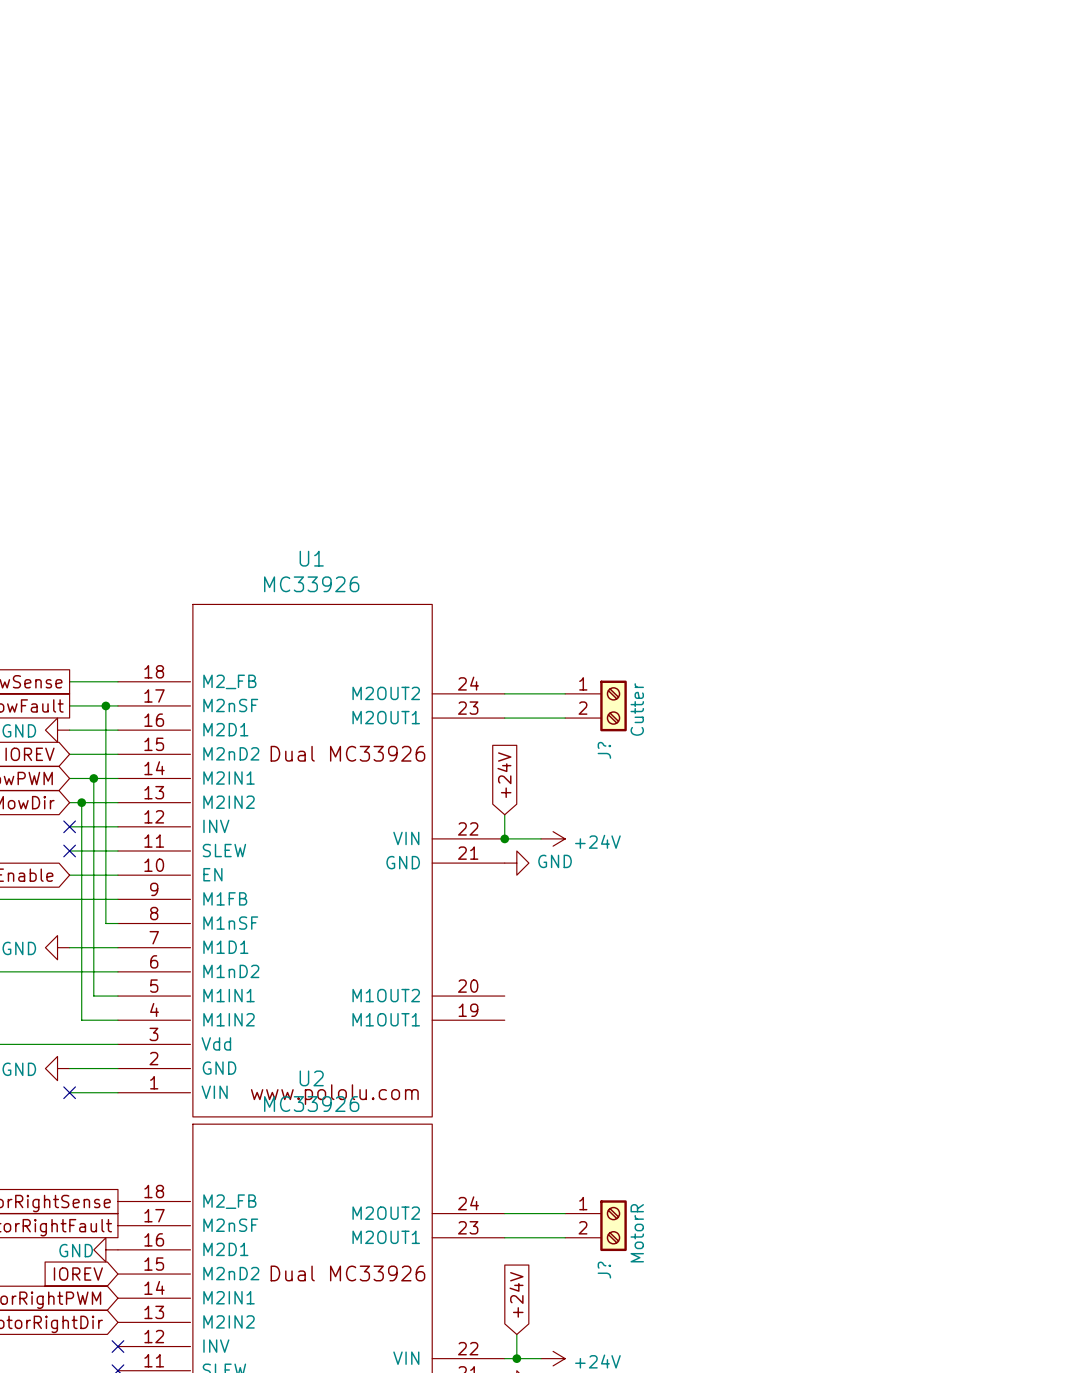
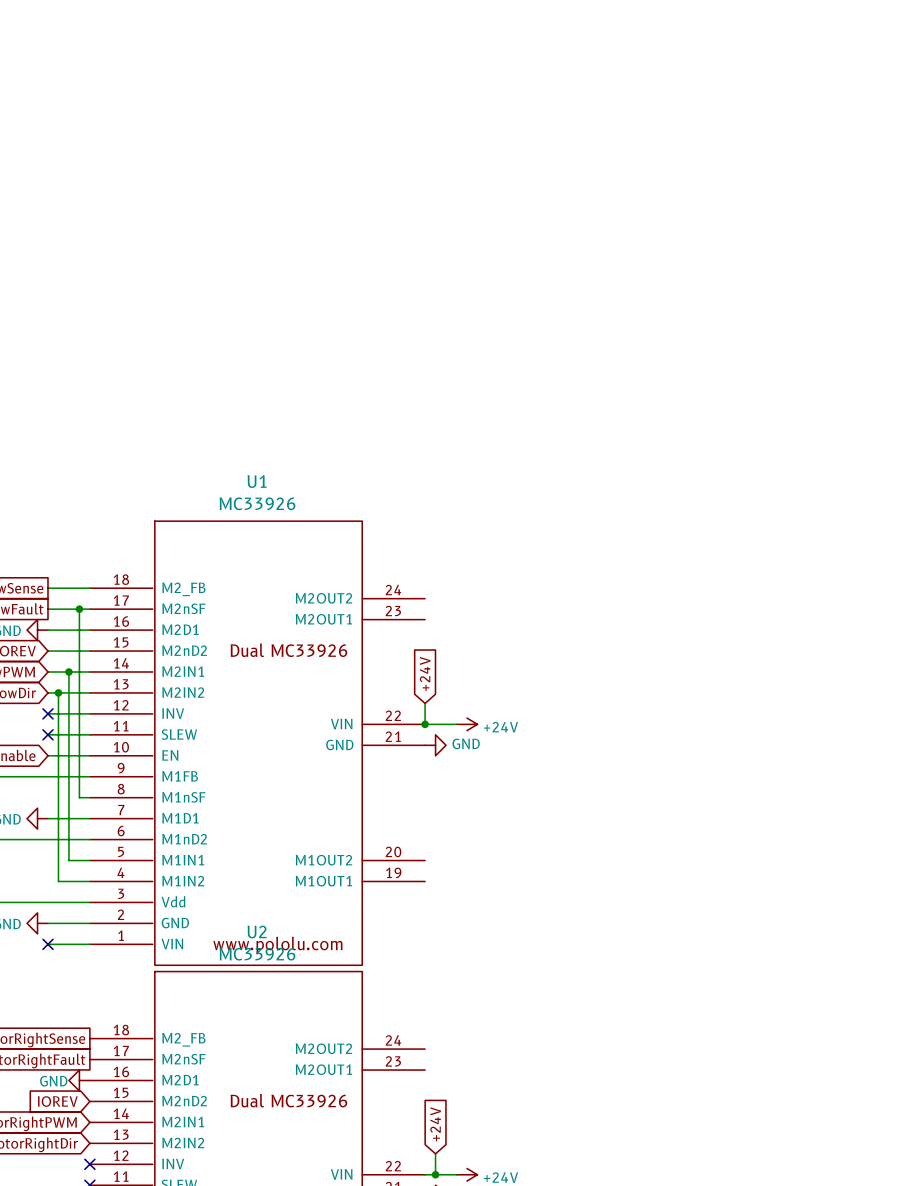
wire: (504, 693) (565, 693) -> none
J?: Cutter (595, 705) -> none
wire: (504, 718) (565, 718) -> none
wire: (504, 1213) (565, 1213) -> none
J?: MotorR (595, 1225) -> none
wire: (504, 1237) (565, 1237) -> none

